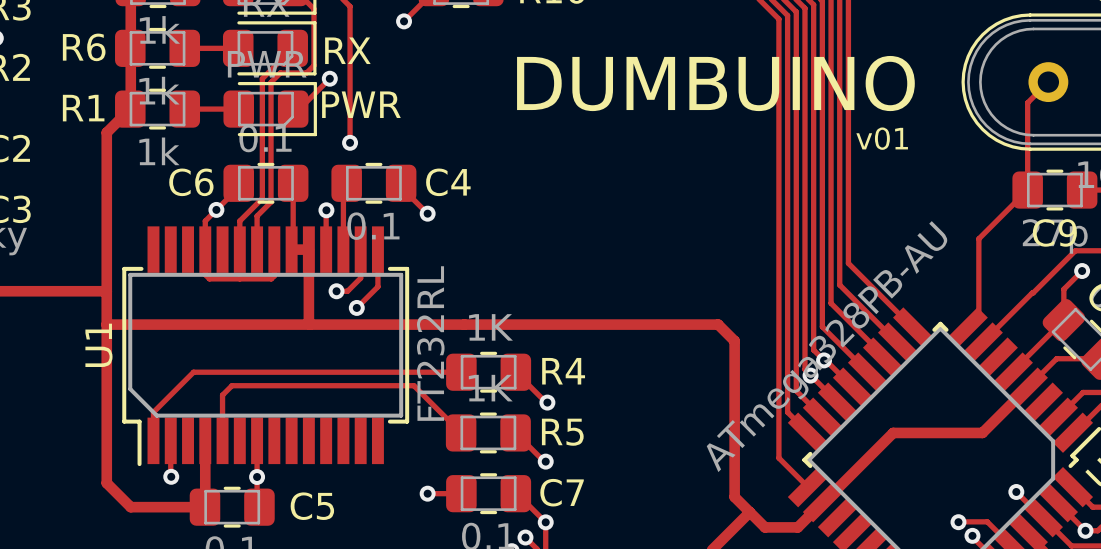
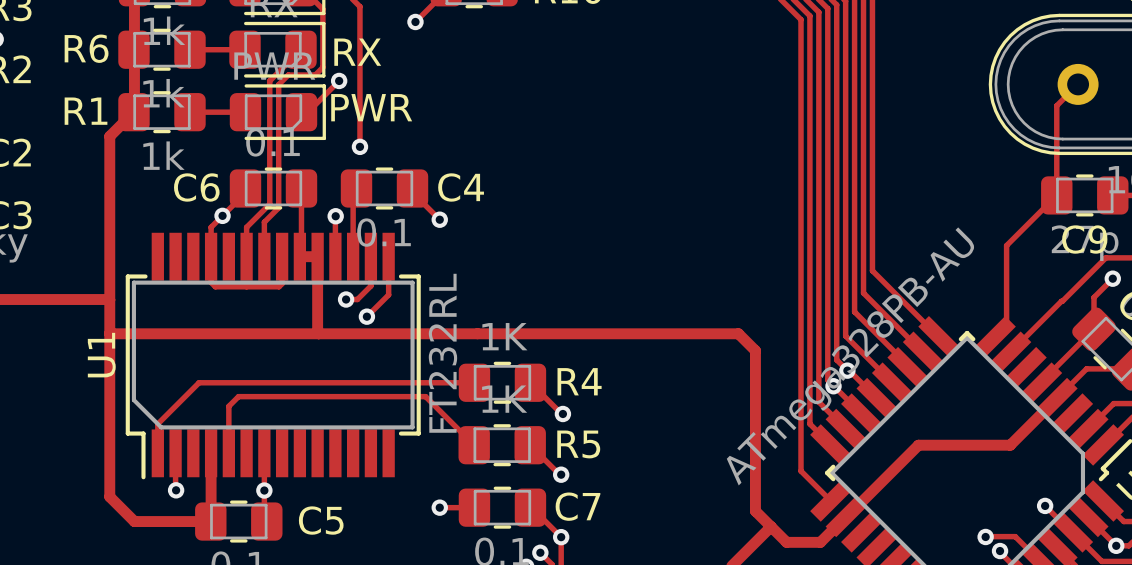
text: DUMBUINO (715, 83) -> none
text: v01 (882, 138) -> none

